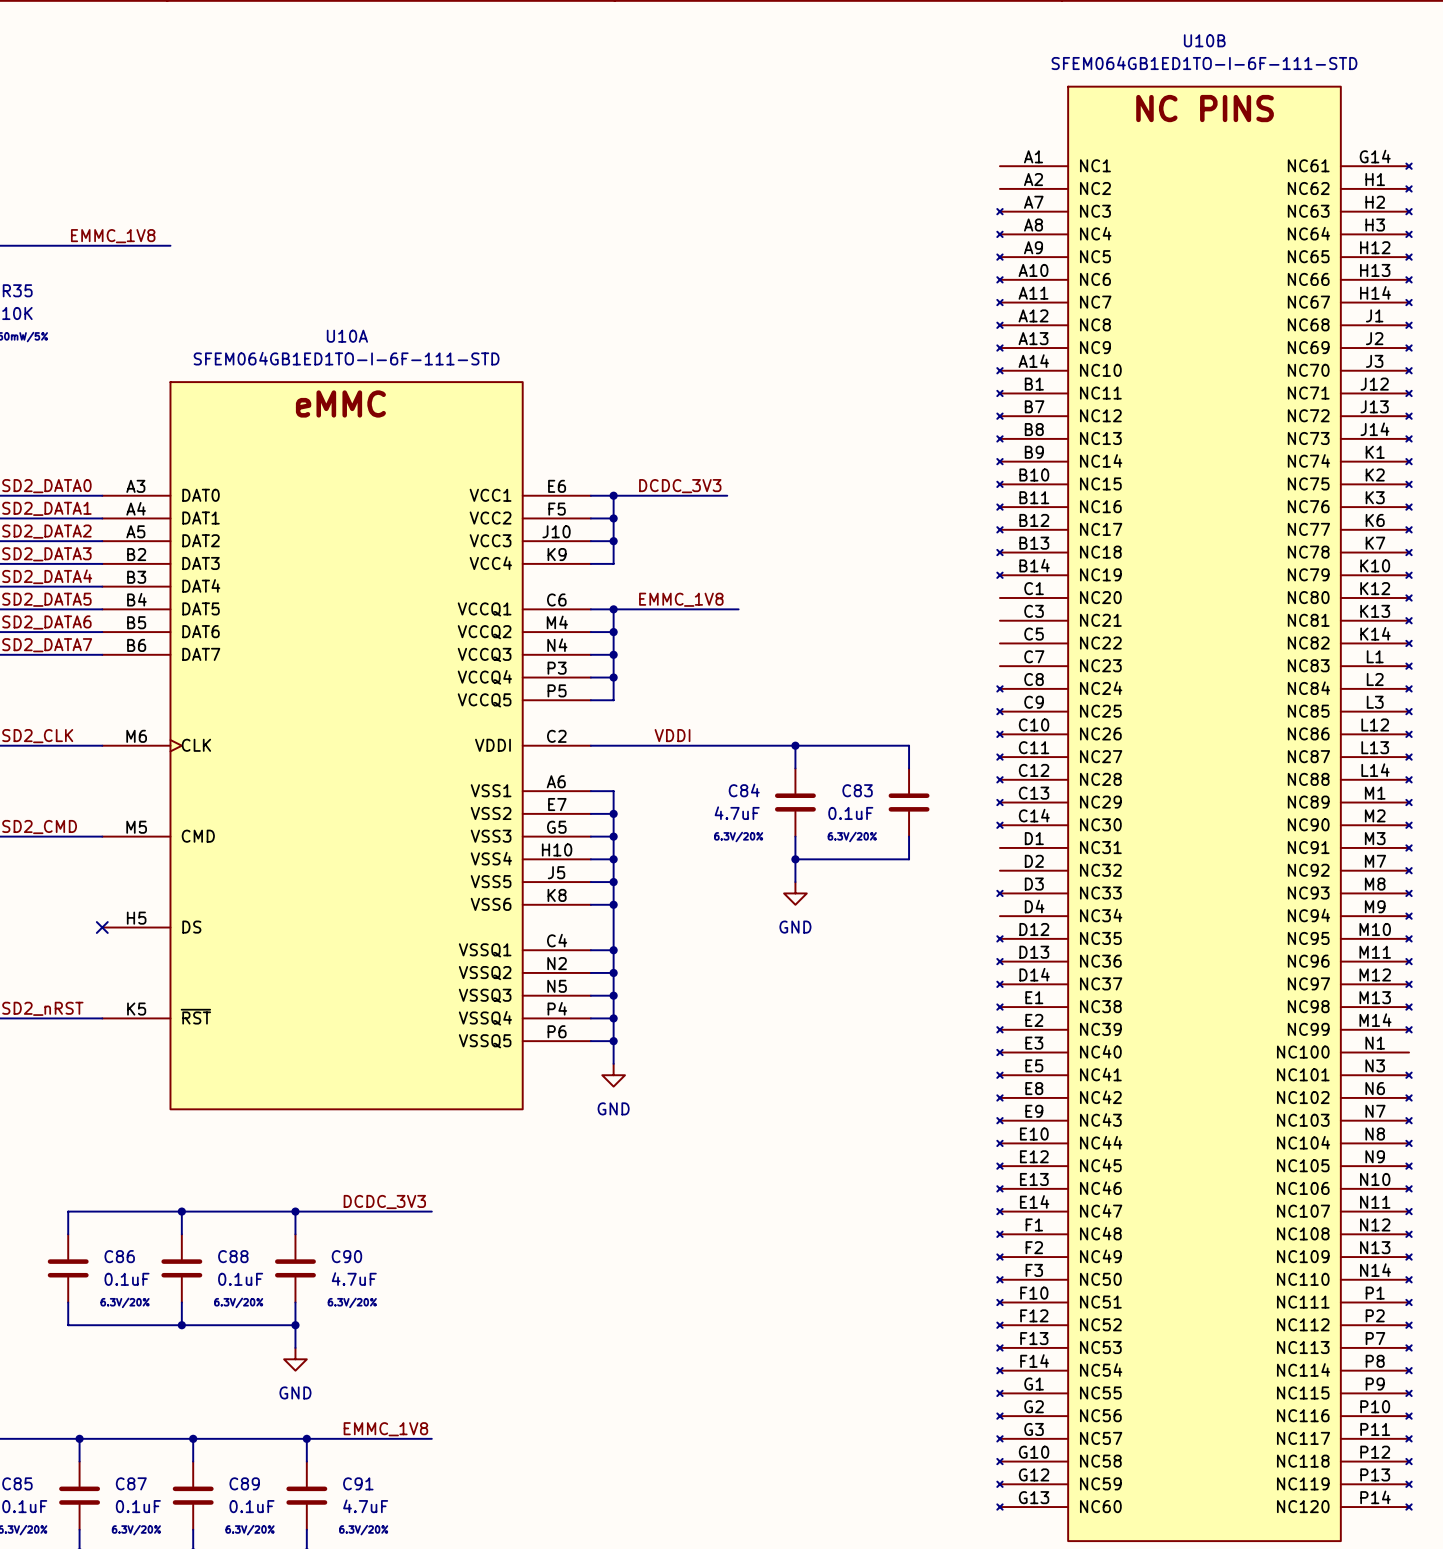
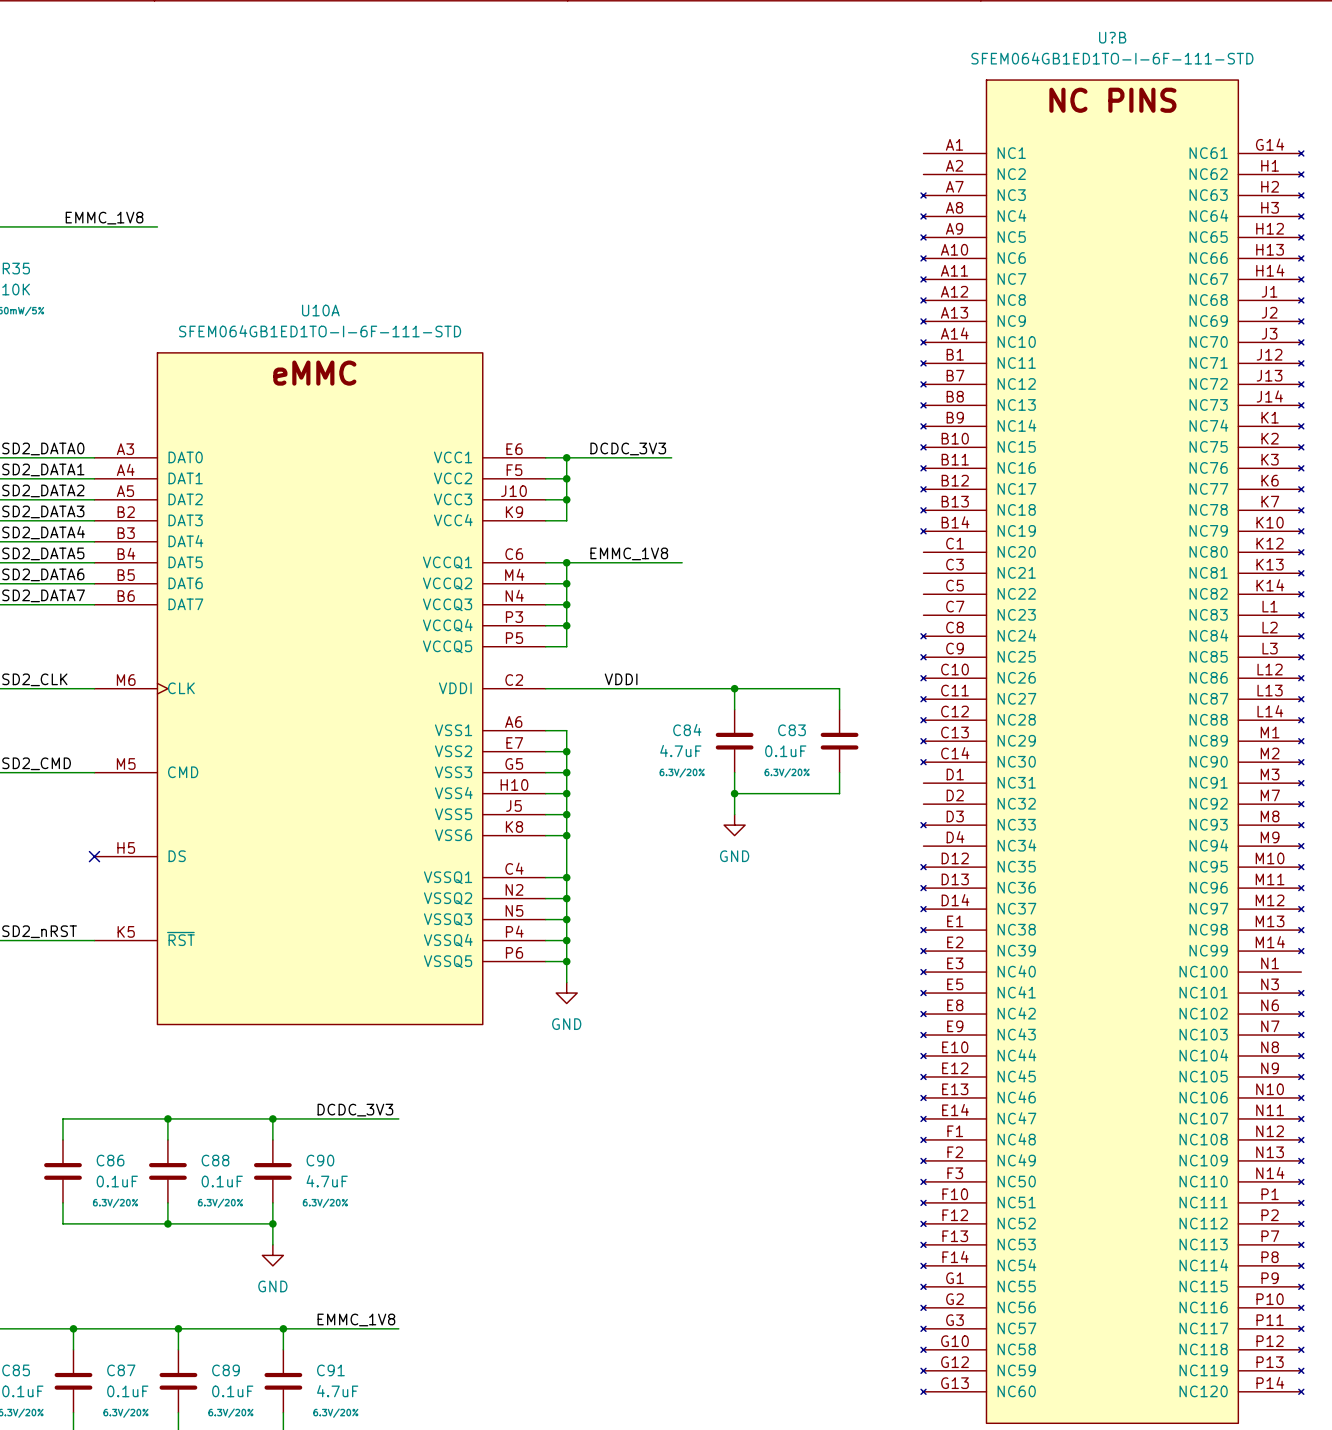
U10B name: U10B (1204, 40) -> U?B (1112, 37)

